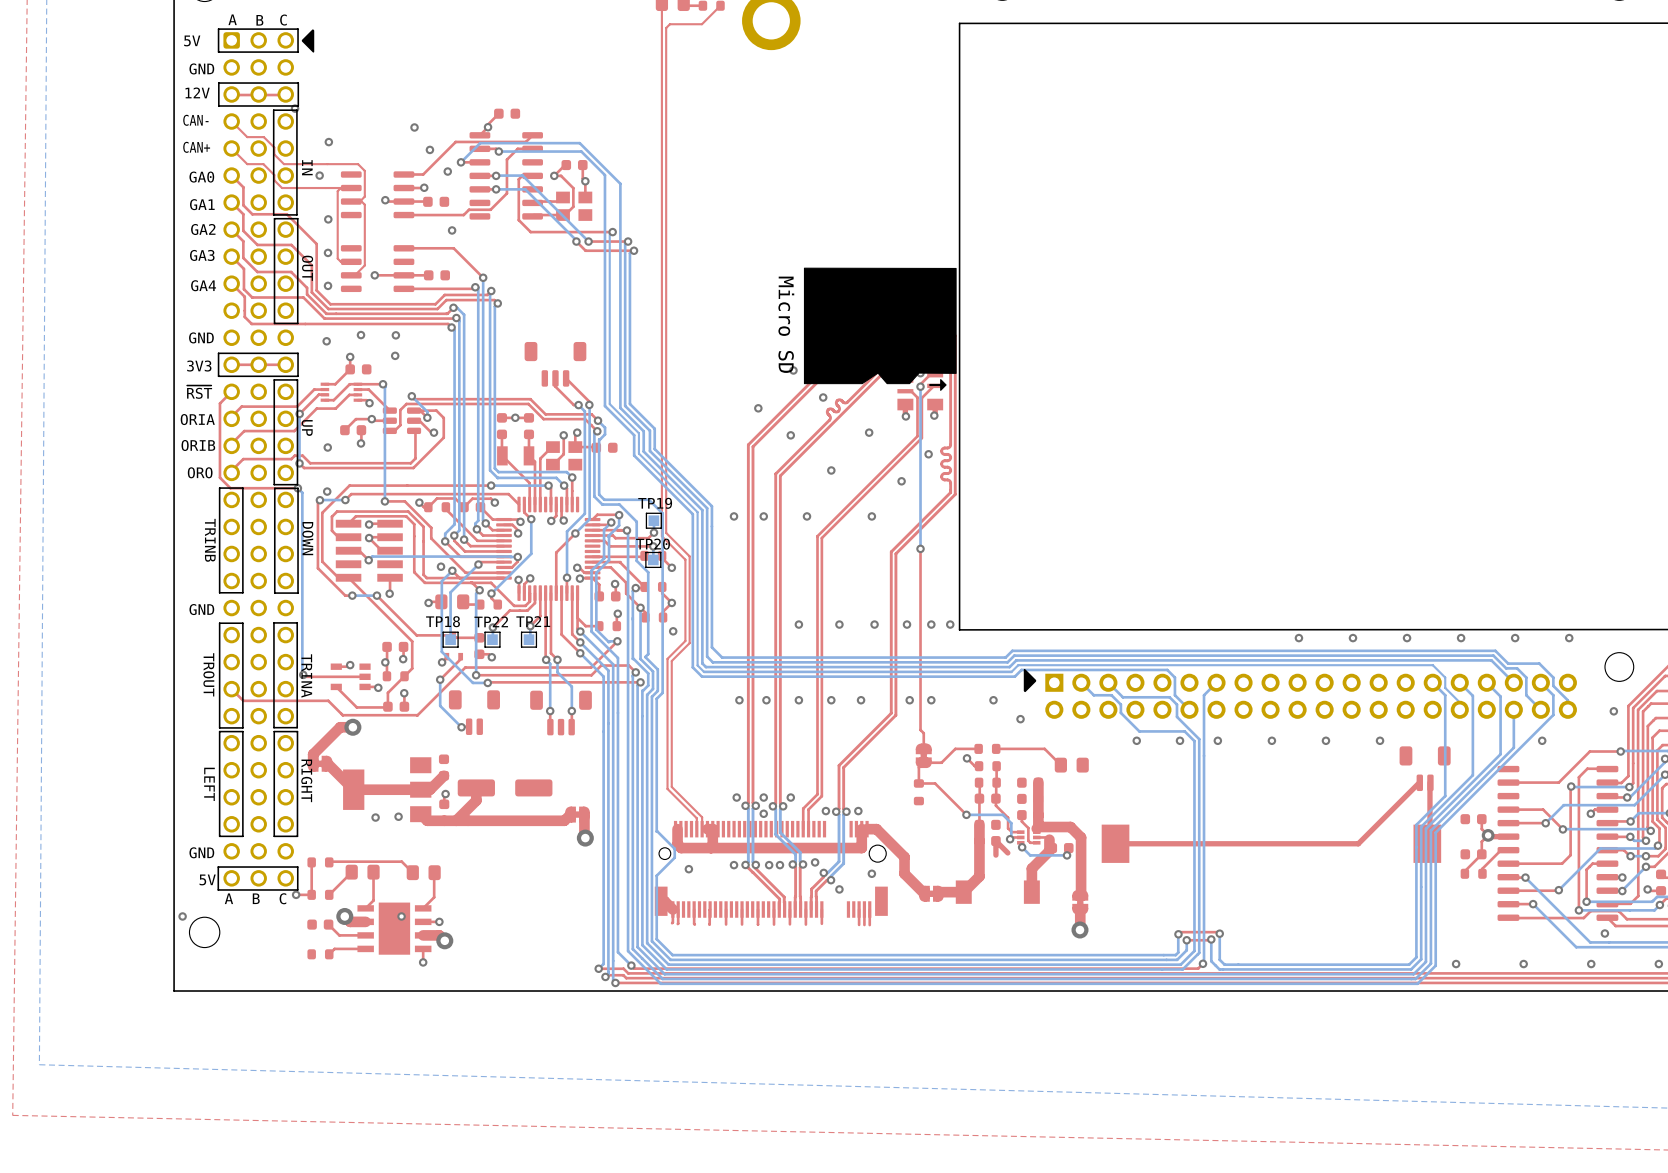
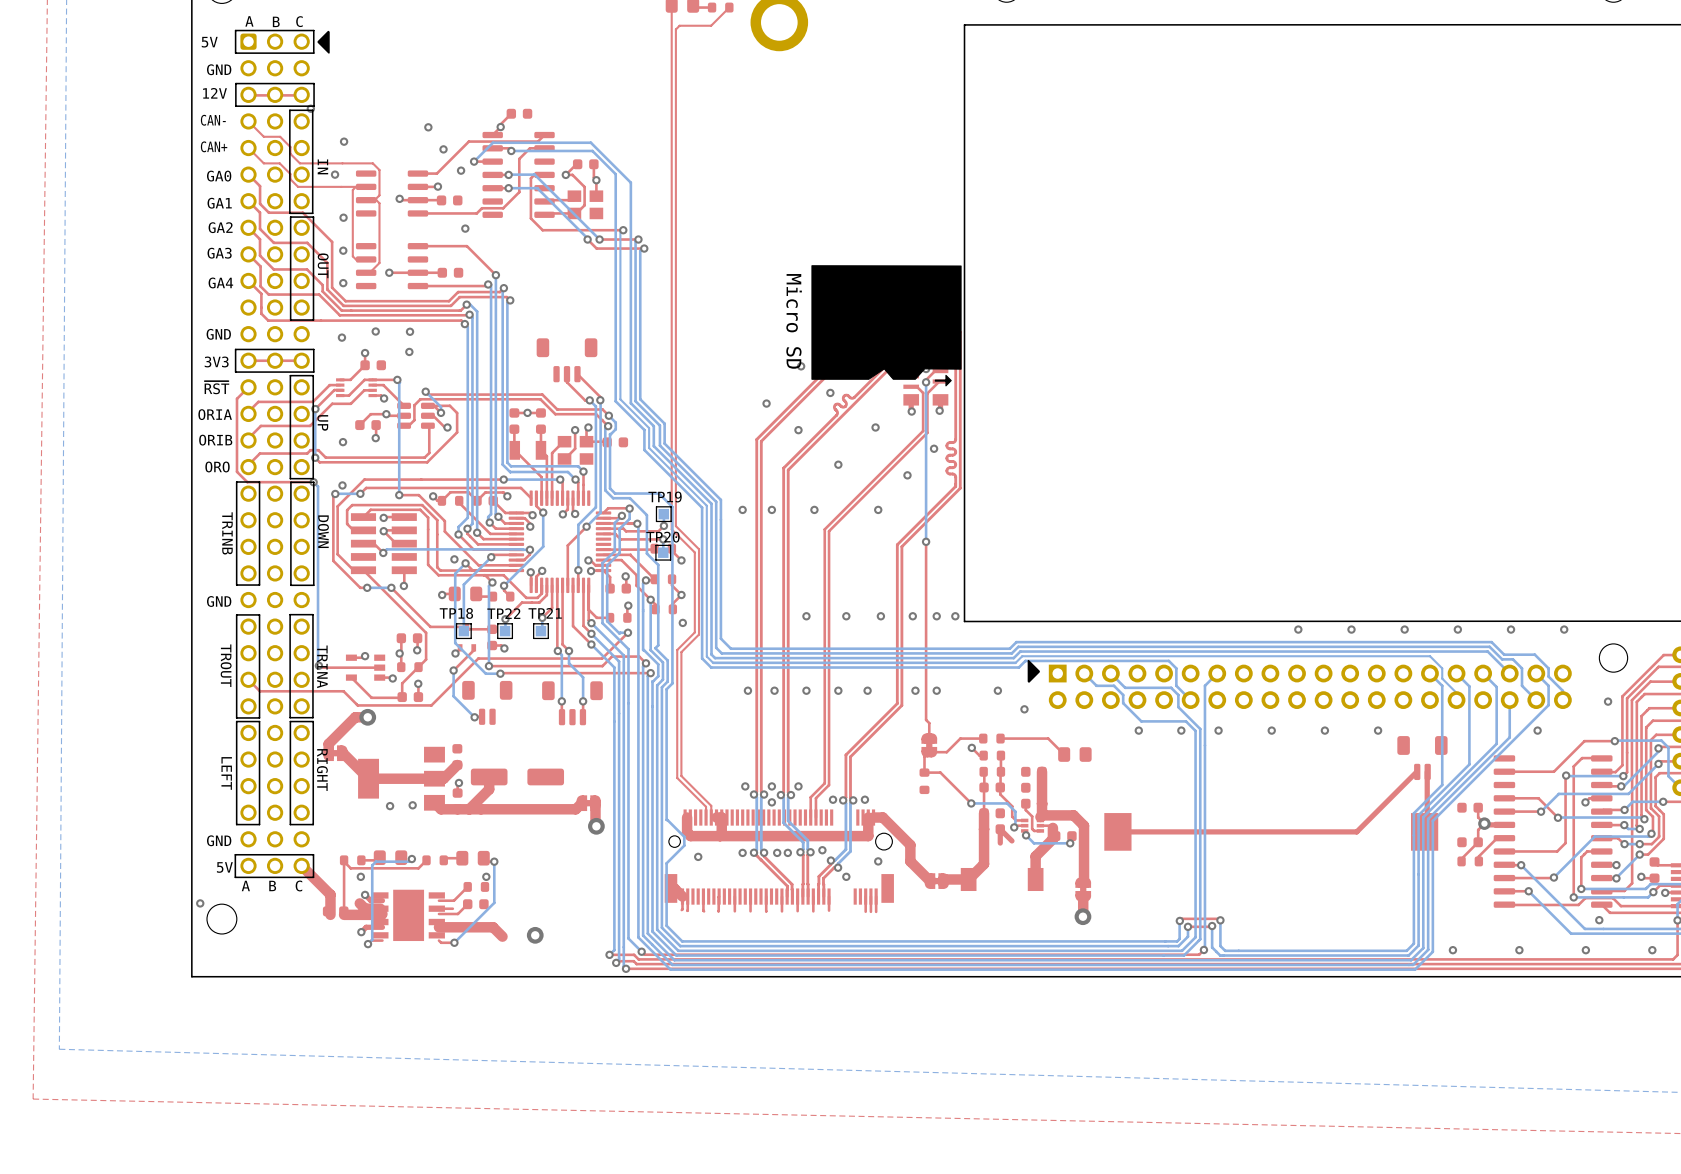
top track: (311, 862) (311, 894) (296, 894) -> none
part: (320, 862) -> none
top track: (329, 862) (401, 861) (412, 872) -> (344, 861) (350, 868) (418, 868) (426, 860)
part footprint: [406, 865, 441, 881] -> [422, 855, 448, 866]
top track: none -> (379, 857) (377, 860) (361, 860)
top track: none -> (462, 858) (445, 858) (443, 860)
part: none -> (473, 858)
bottom track: none -> (411, 859) (409, 861) (375, 861) (372, 865) (372, 939) (368, 944)
via: none -> (411, 859)
top track: none -> (344, 860) (344, 914) (382, 913)
part: none -> (352, 860)
top track: (351, 872) (329, 894) -> none
part position: (362, 872) -> (390, 857)
top track: (373, 872) (373, 900) (365, 908) -> none
bottom track: none -> (494, 861) (494, 902) (454, 942)
via: none -> (494, 861)
top track: (434, 875) (434, 897) (423, 908) -> none
top track: none -> (301, 865) (330, 894) (330, 914)
via: none -> (360, 876)
via: none -> (486, 876)
via: (296, 894) -> none
part: (320, 894) -> none
top track: none -> (467, 886) (453, 900) (438, 900)
part: none -> (476, 886)
via size: [336, 907, 354, 925] -> [360, 890, 370, 900]
top track: none -> (365, 894) (370, 900) (382, 900)
via: (401, 916) -> none
top track: none -> (467, 904) (457, 913) (438, 913)
part: none -> (475, 904)
via: (439, 921) -> none
top track: (328, 924) (339, 935) (365, 935) -> none
top track: (423, 935) (439, 935) (444, 940) -> none
top track: none -> (382, 927) (366, 927) (361, 932)
top track: none -> (438, 927) (493, 927) (502, 936)
via: (444, 940) -> none
via: none -> (361, 932)
top track: (365, 948) (334, 948) (329, 954) -> none
top track: (423, 948) (423, 962) -> none
via: none -> (535, 935)
part: (320, 954) -> none
top track: none -> (382, 940) (371, 940) (368, 944)
top track: none -> (438, 940) (441, 942) (454, 942)
via: none -> (454, 942)
via: none -> (368, 944)
via: (423, 962) -> none

